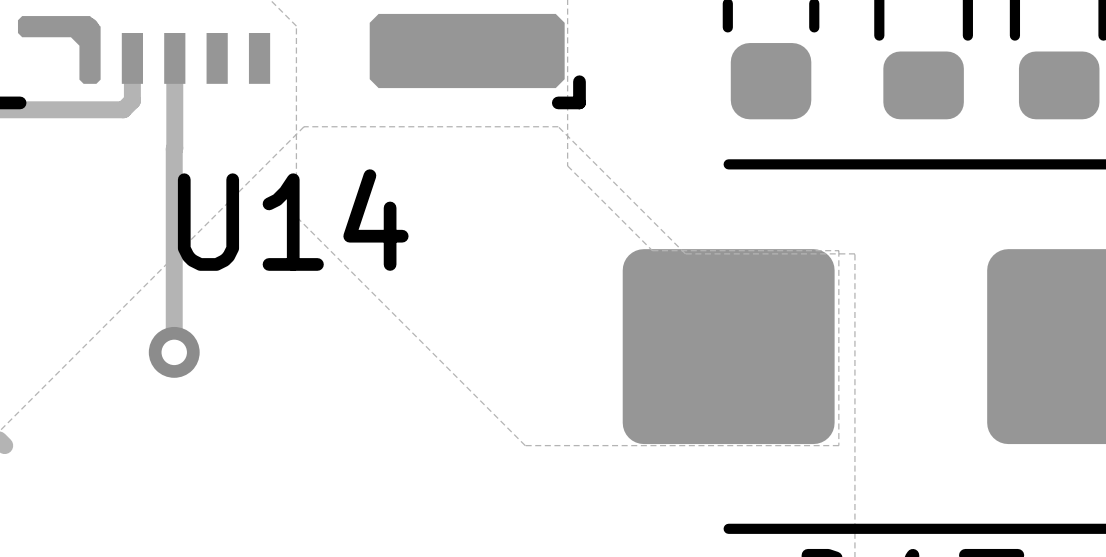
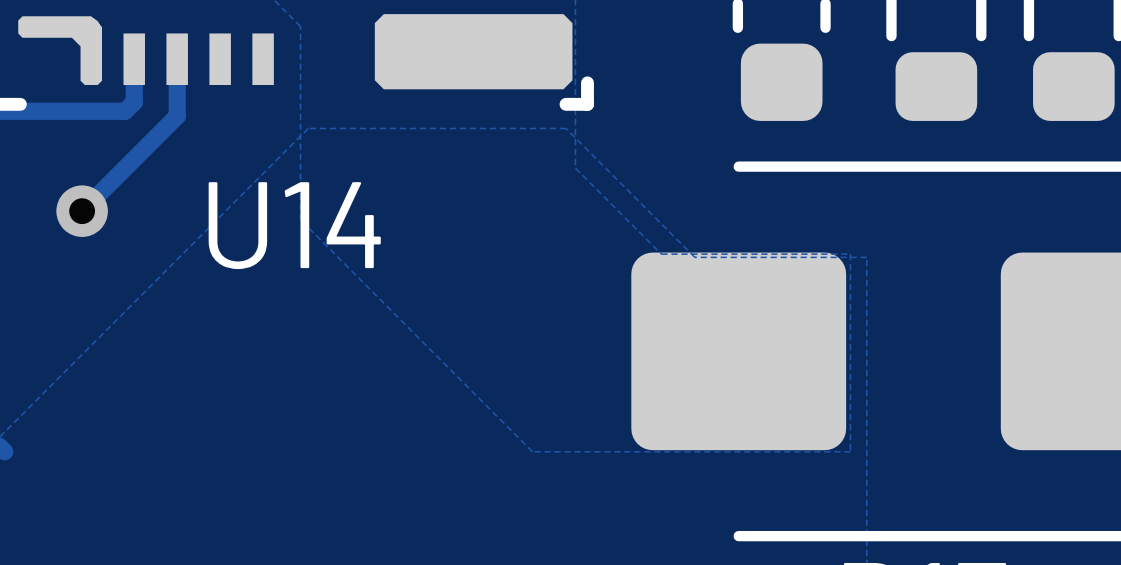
track: (174, 114) (174, 148) -> (177, 116) (82, 211)
track: (174, 148) (174, 352) -> none
via: none -> (82, 211)
via: (174, 352) -> none

